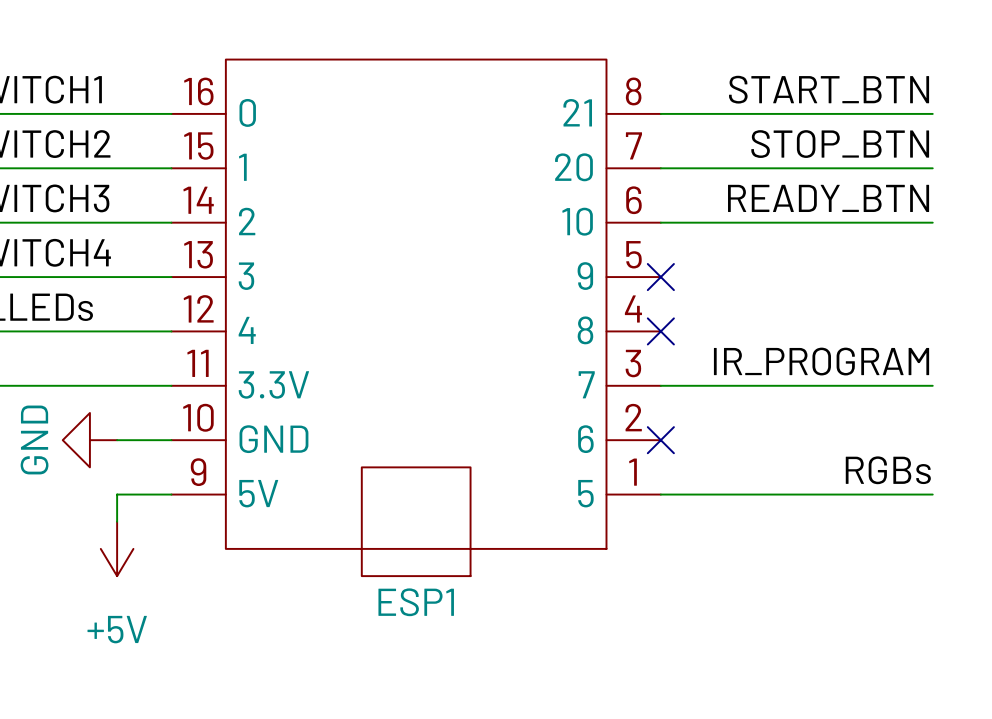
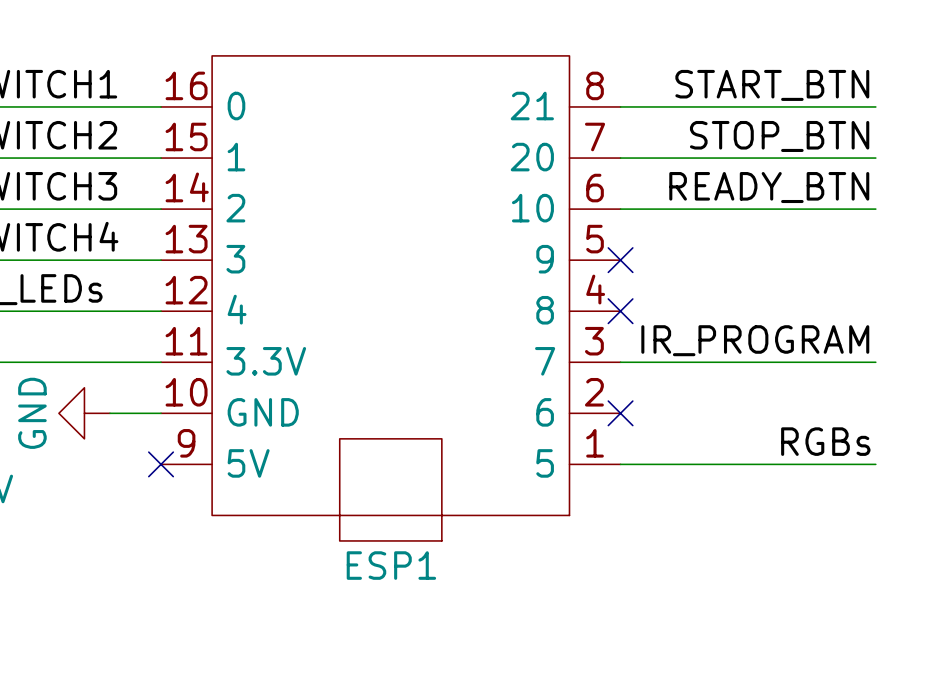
wire: (171, 494) (117, 494) (117, 521) -> none
no-connect mark: none -> (161, 464)
power symbol: +5V (117, 548) -> none

